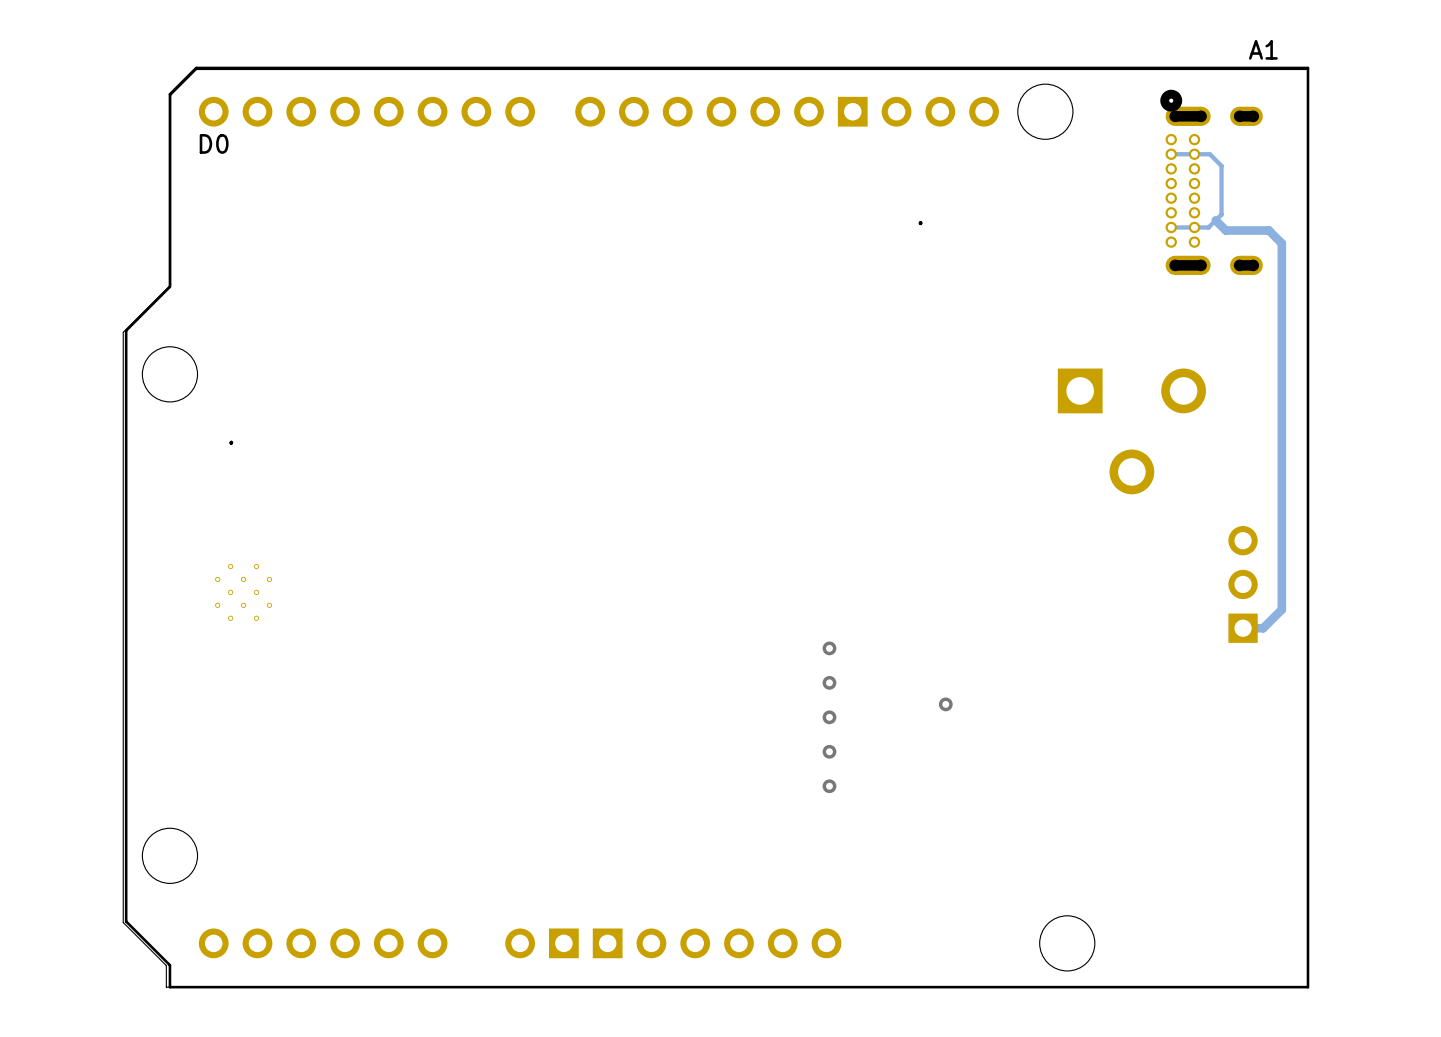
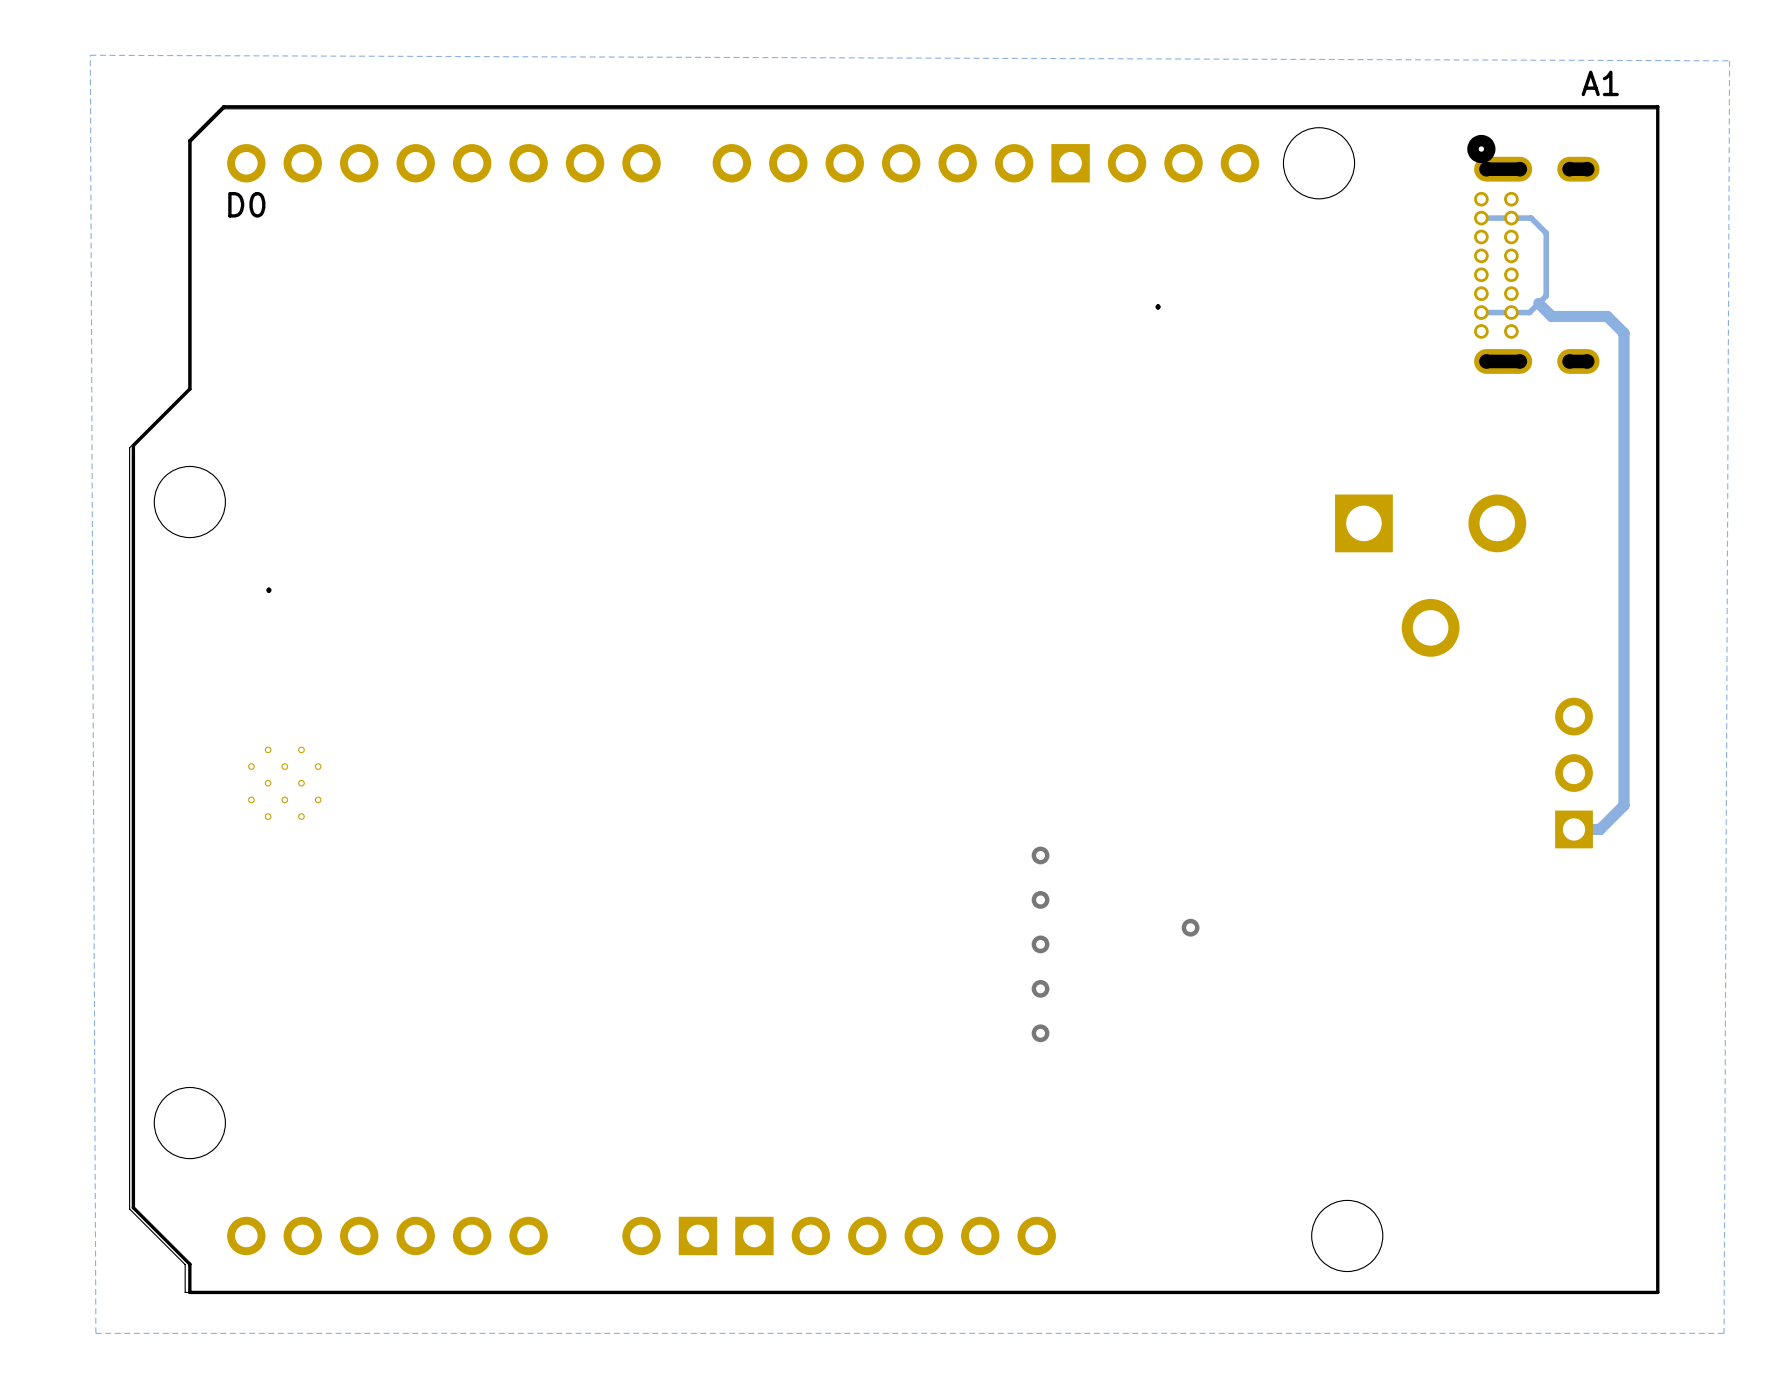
zone outline: none -> (90, 55) (95, 1333) (1724, 1333) (1729, 60) (90, 55)

